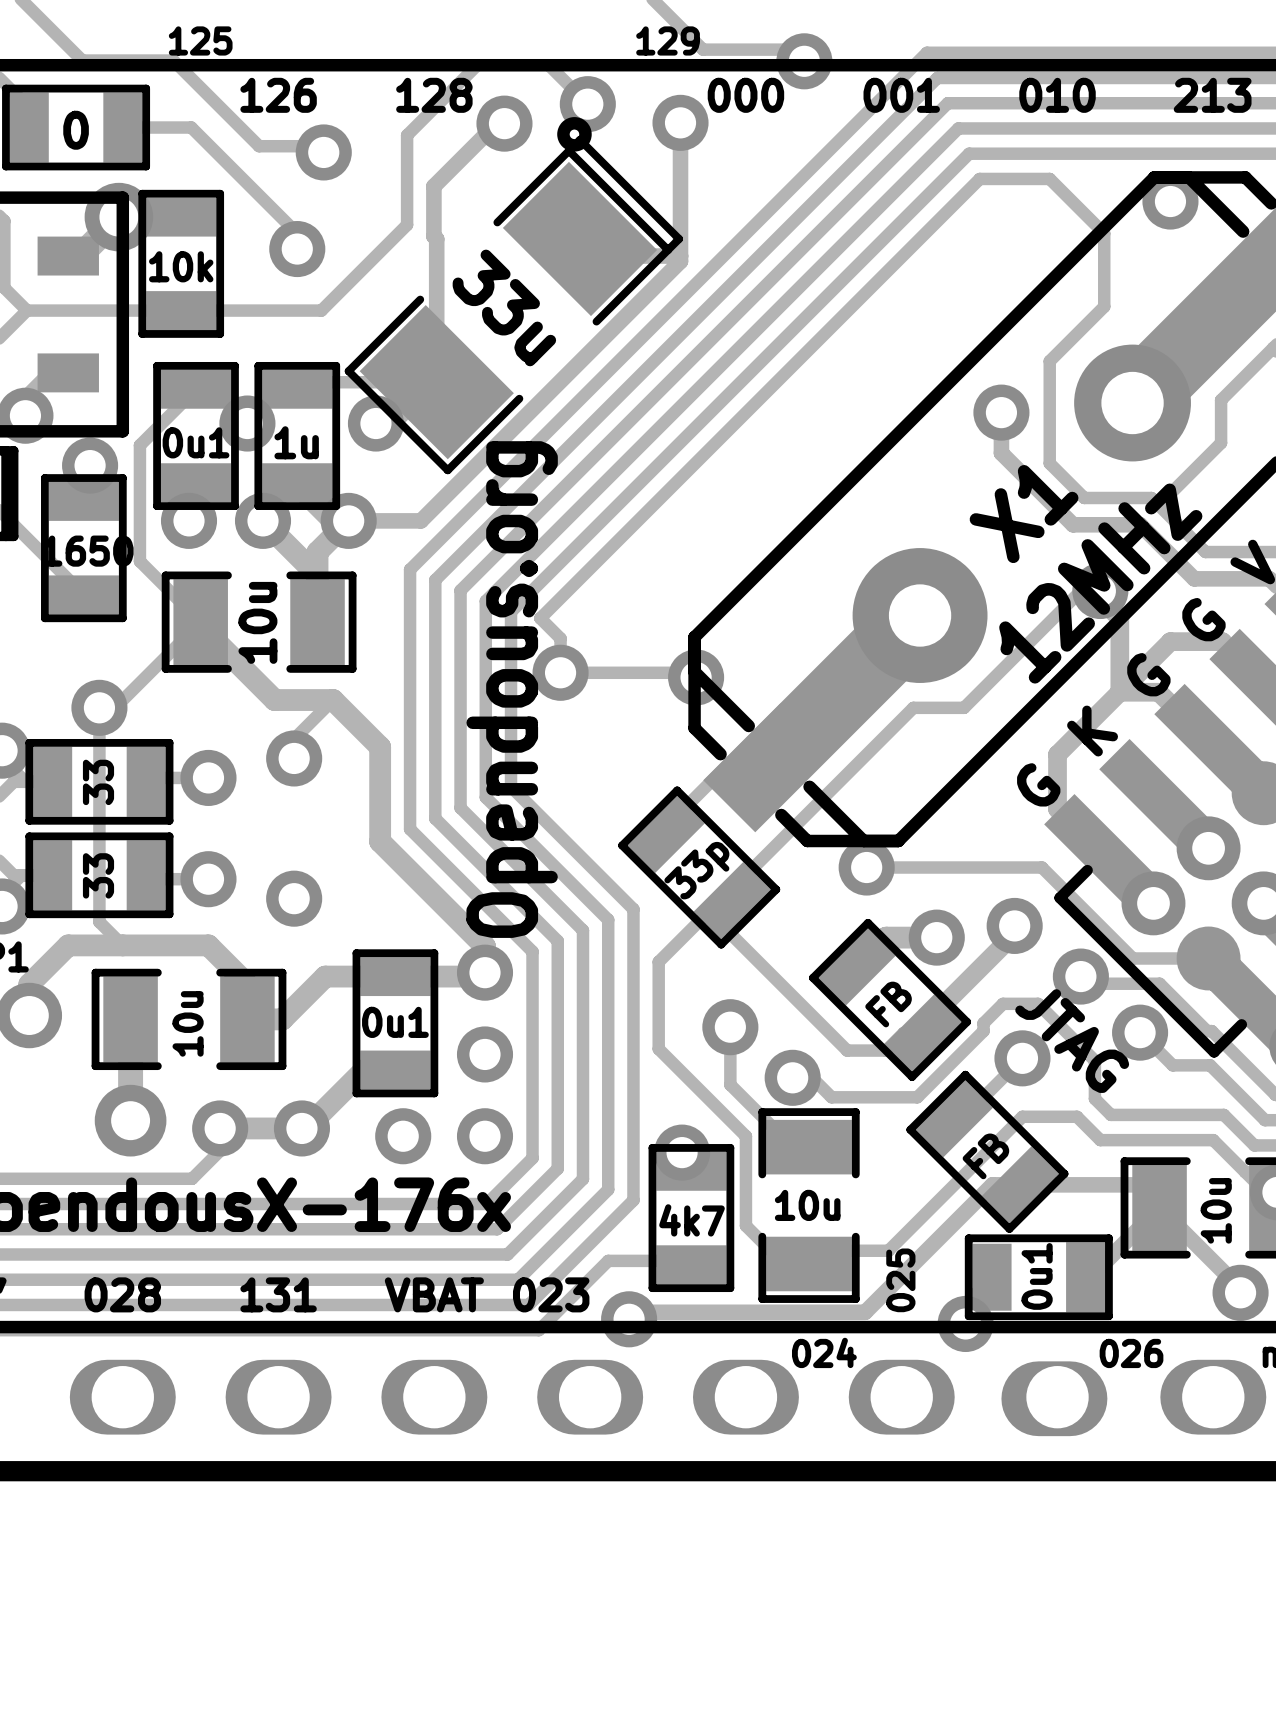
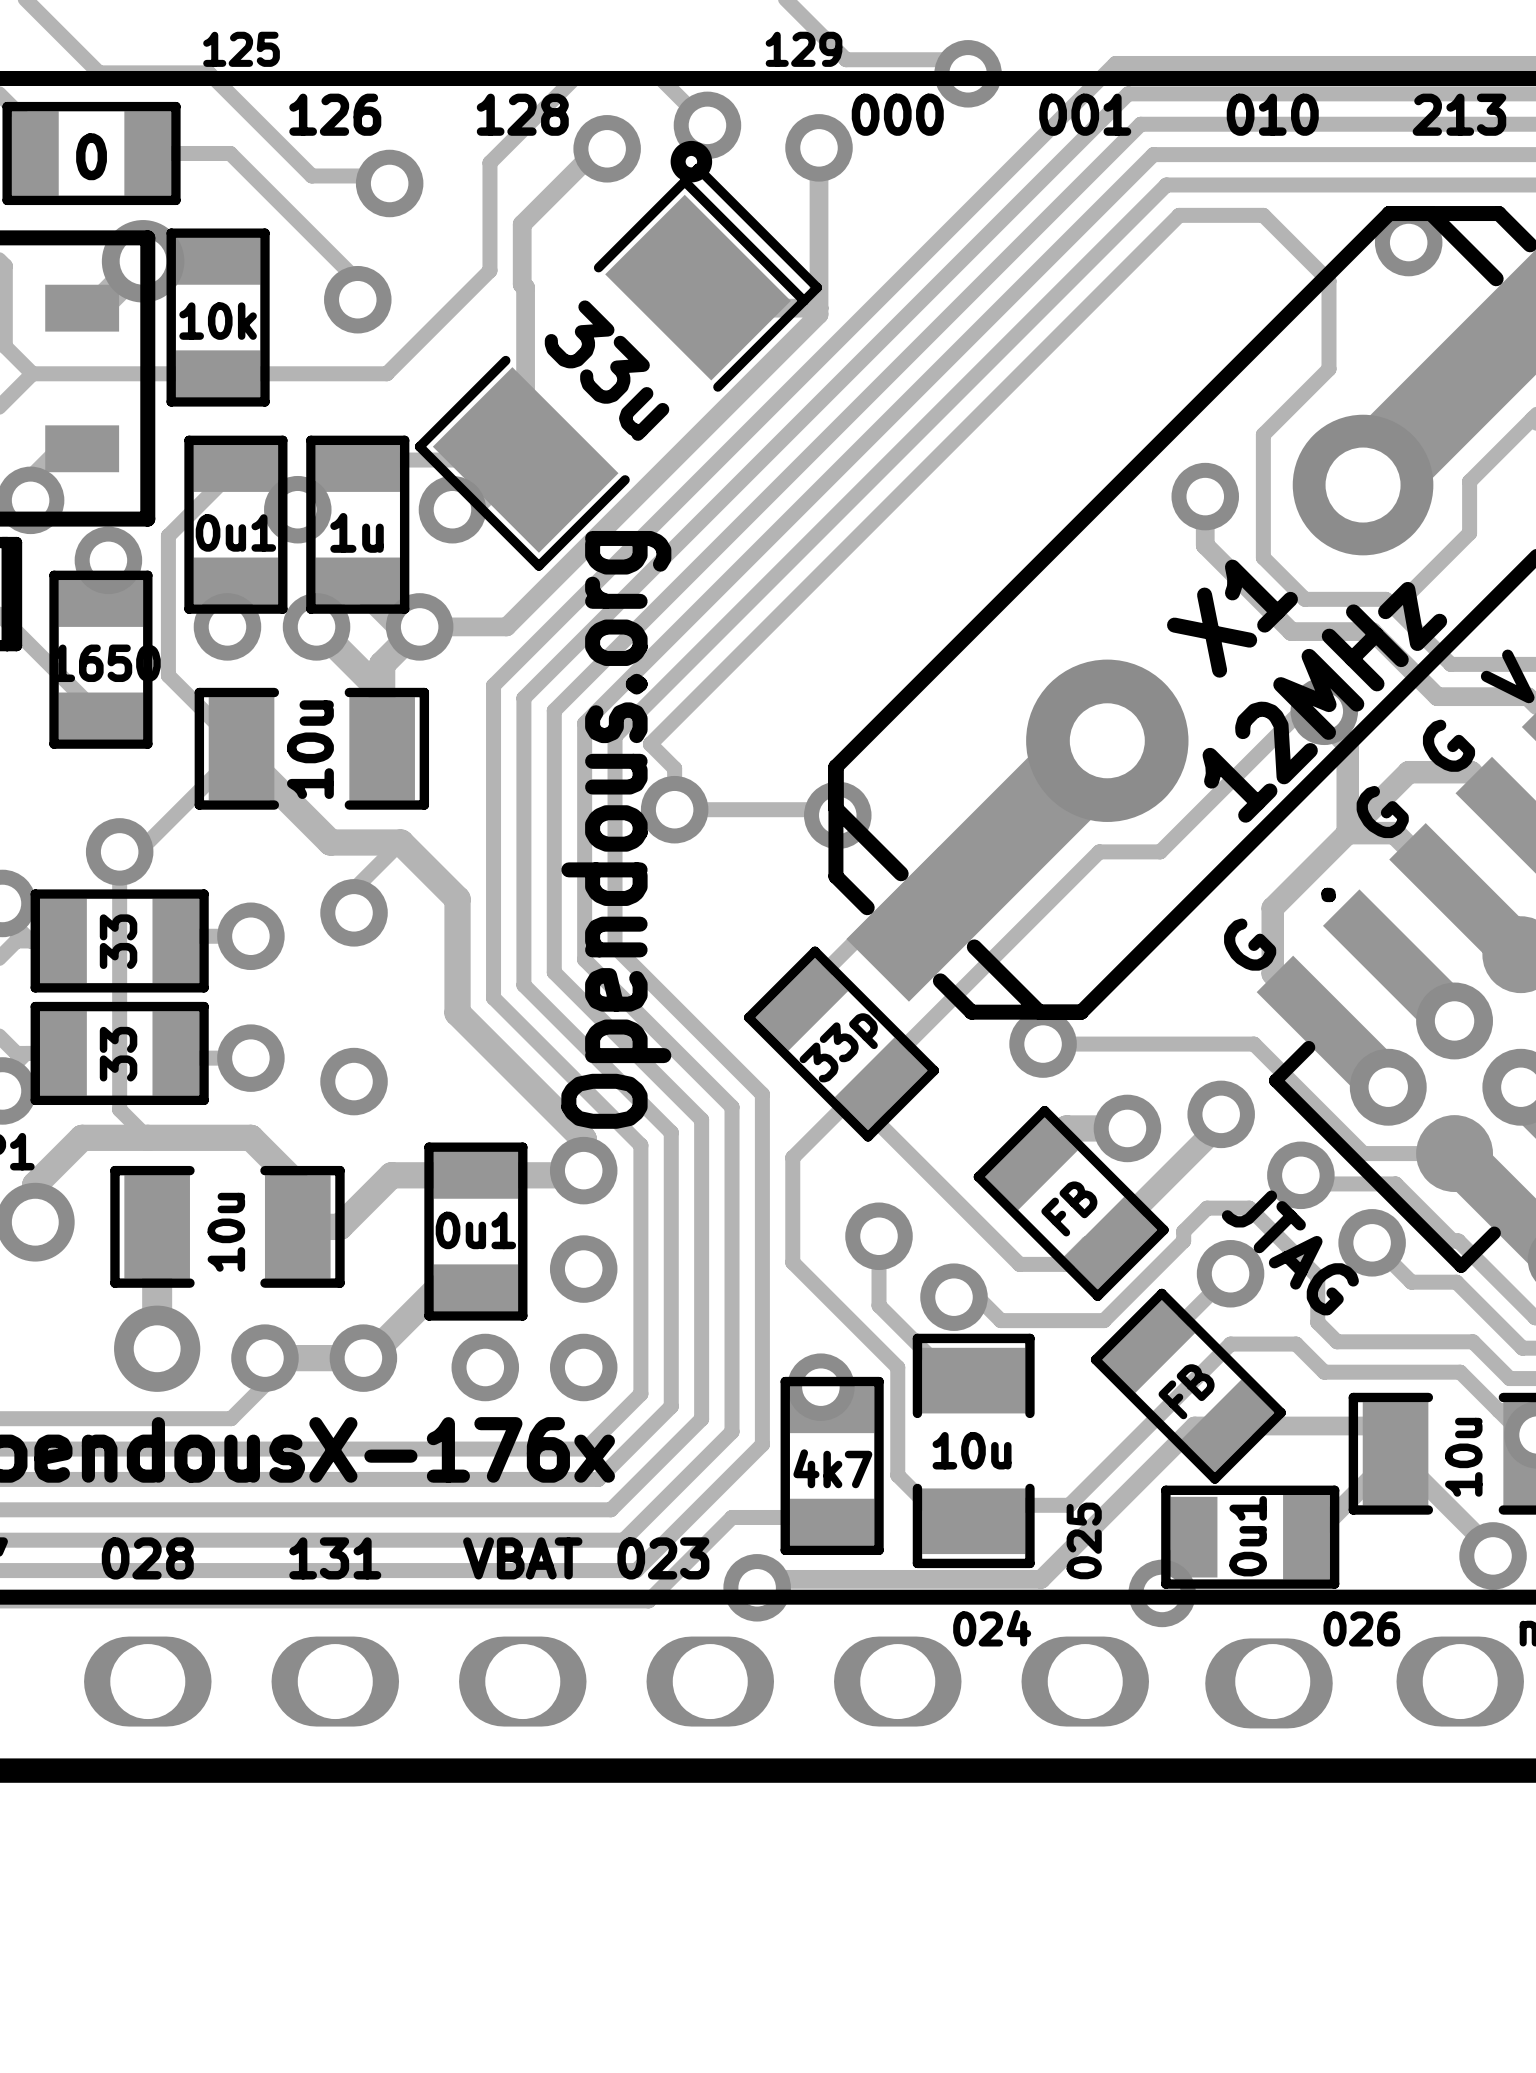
part text: K (1092, 731) -> . (1328, 894)

